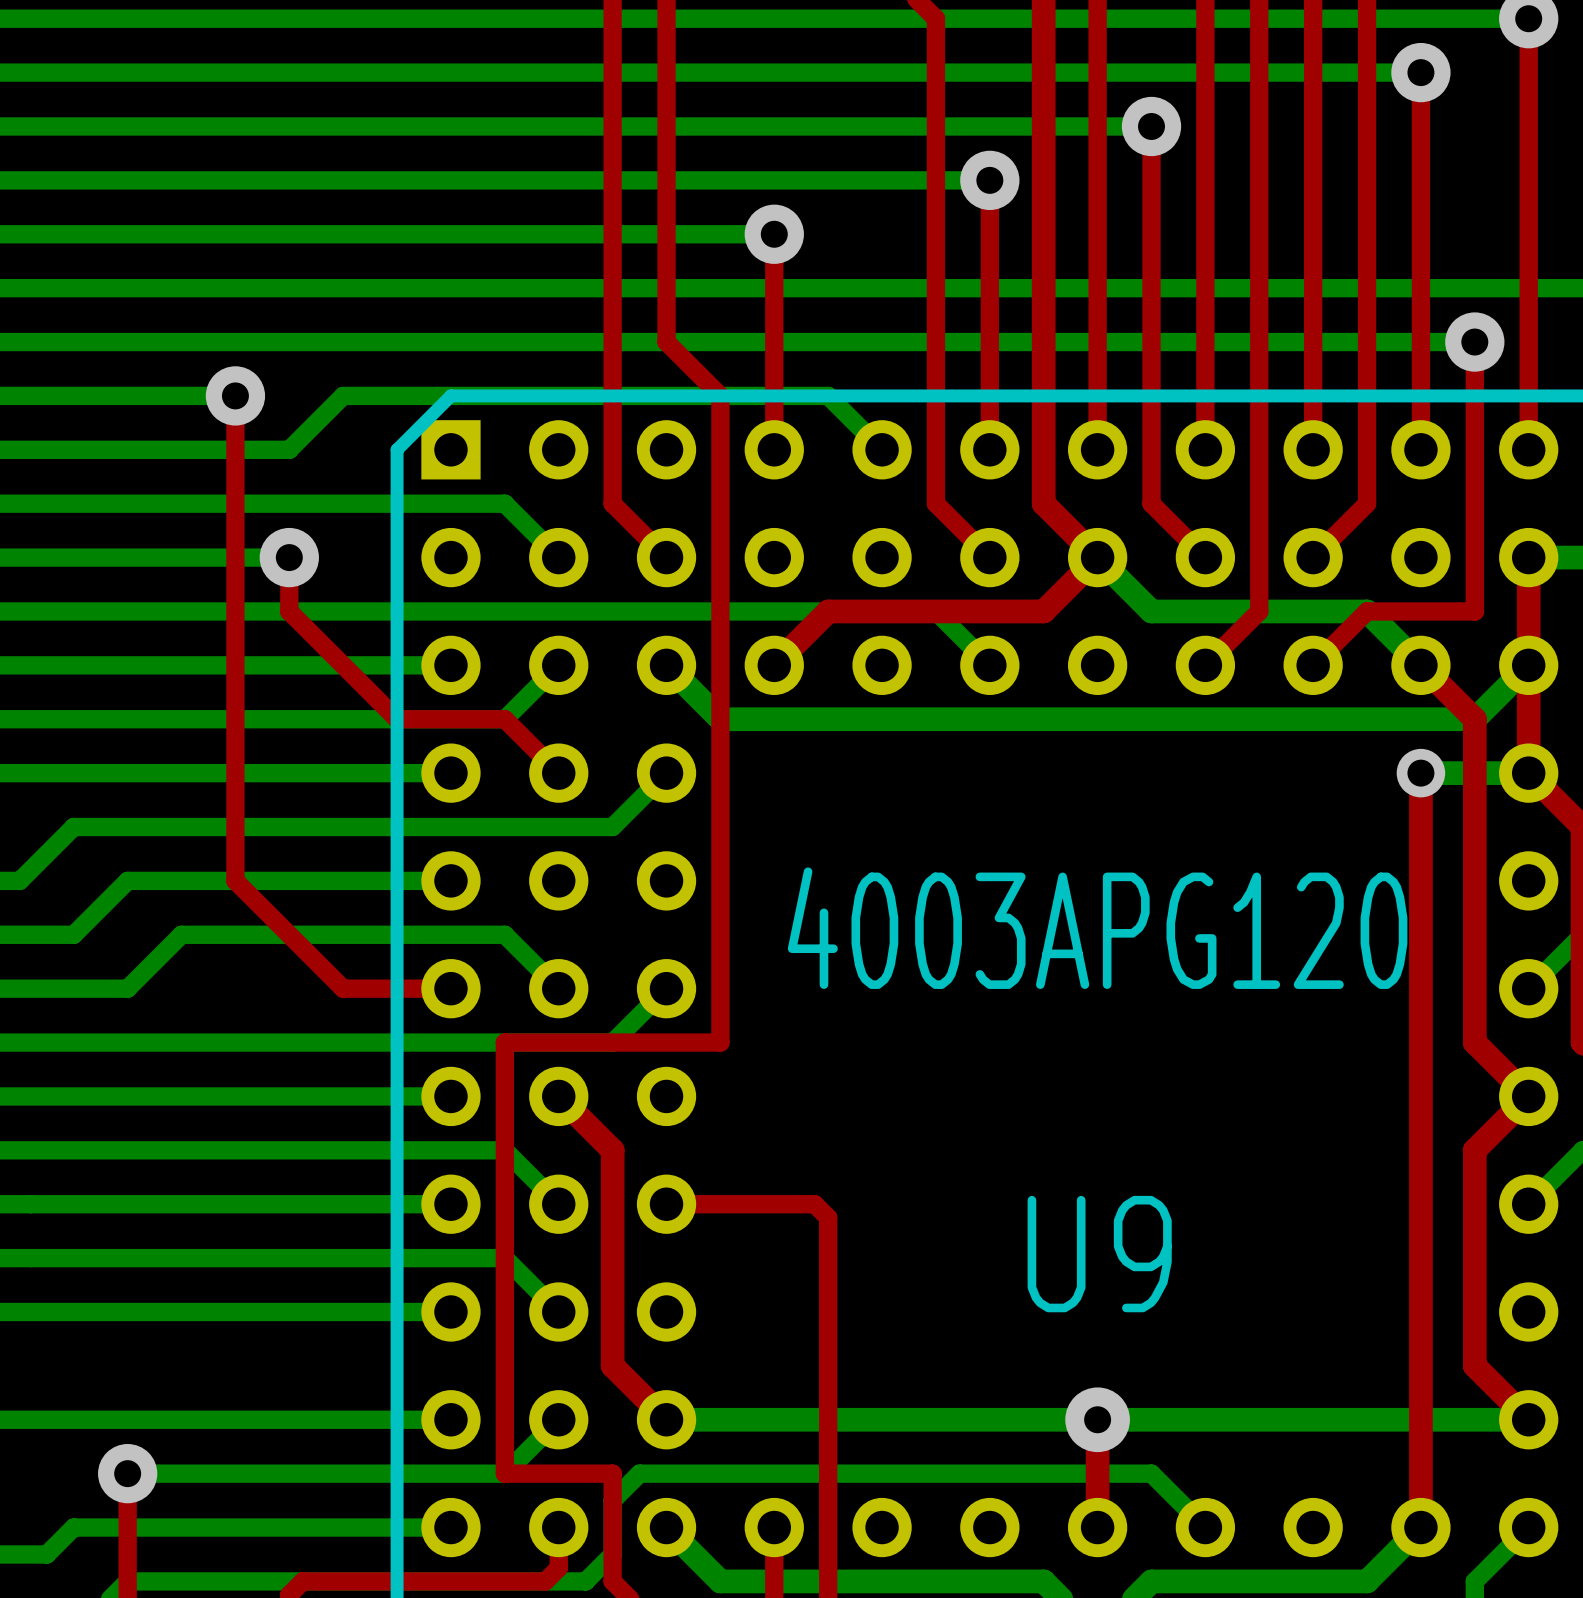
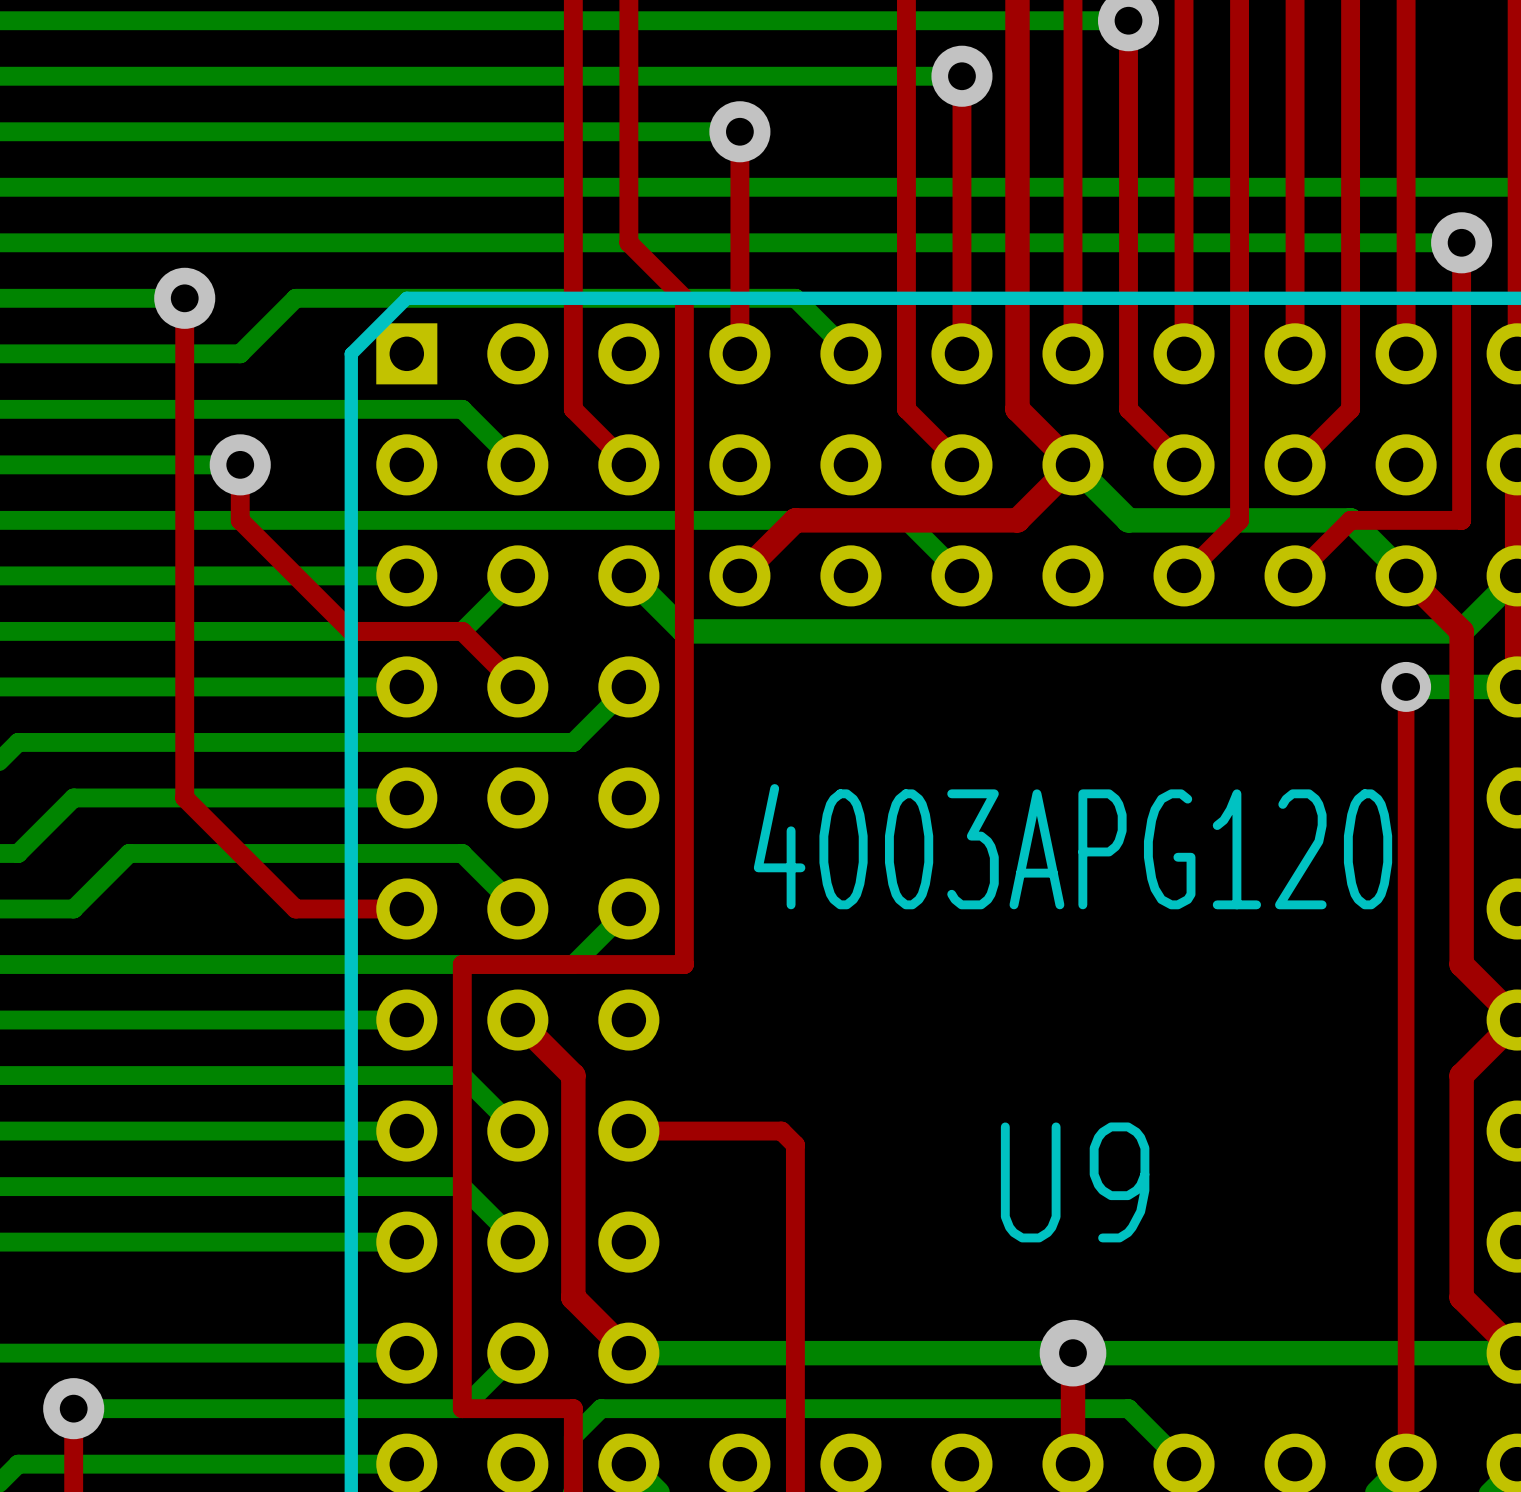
top track width: thick (1420, 773) (1420, 1527) -> thin (1406, 686) (1406, 1464)

